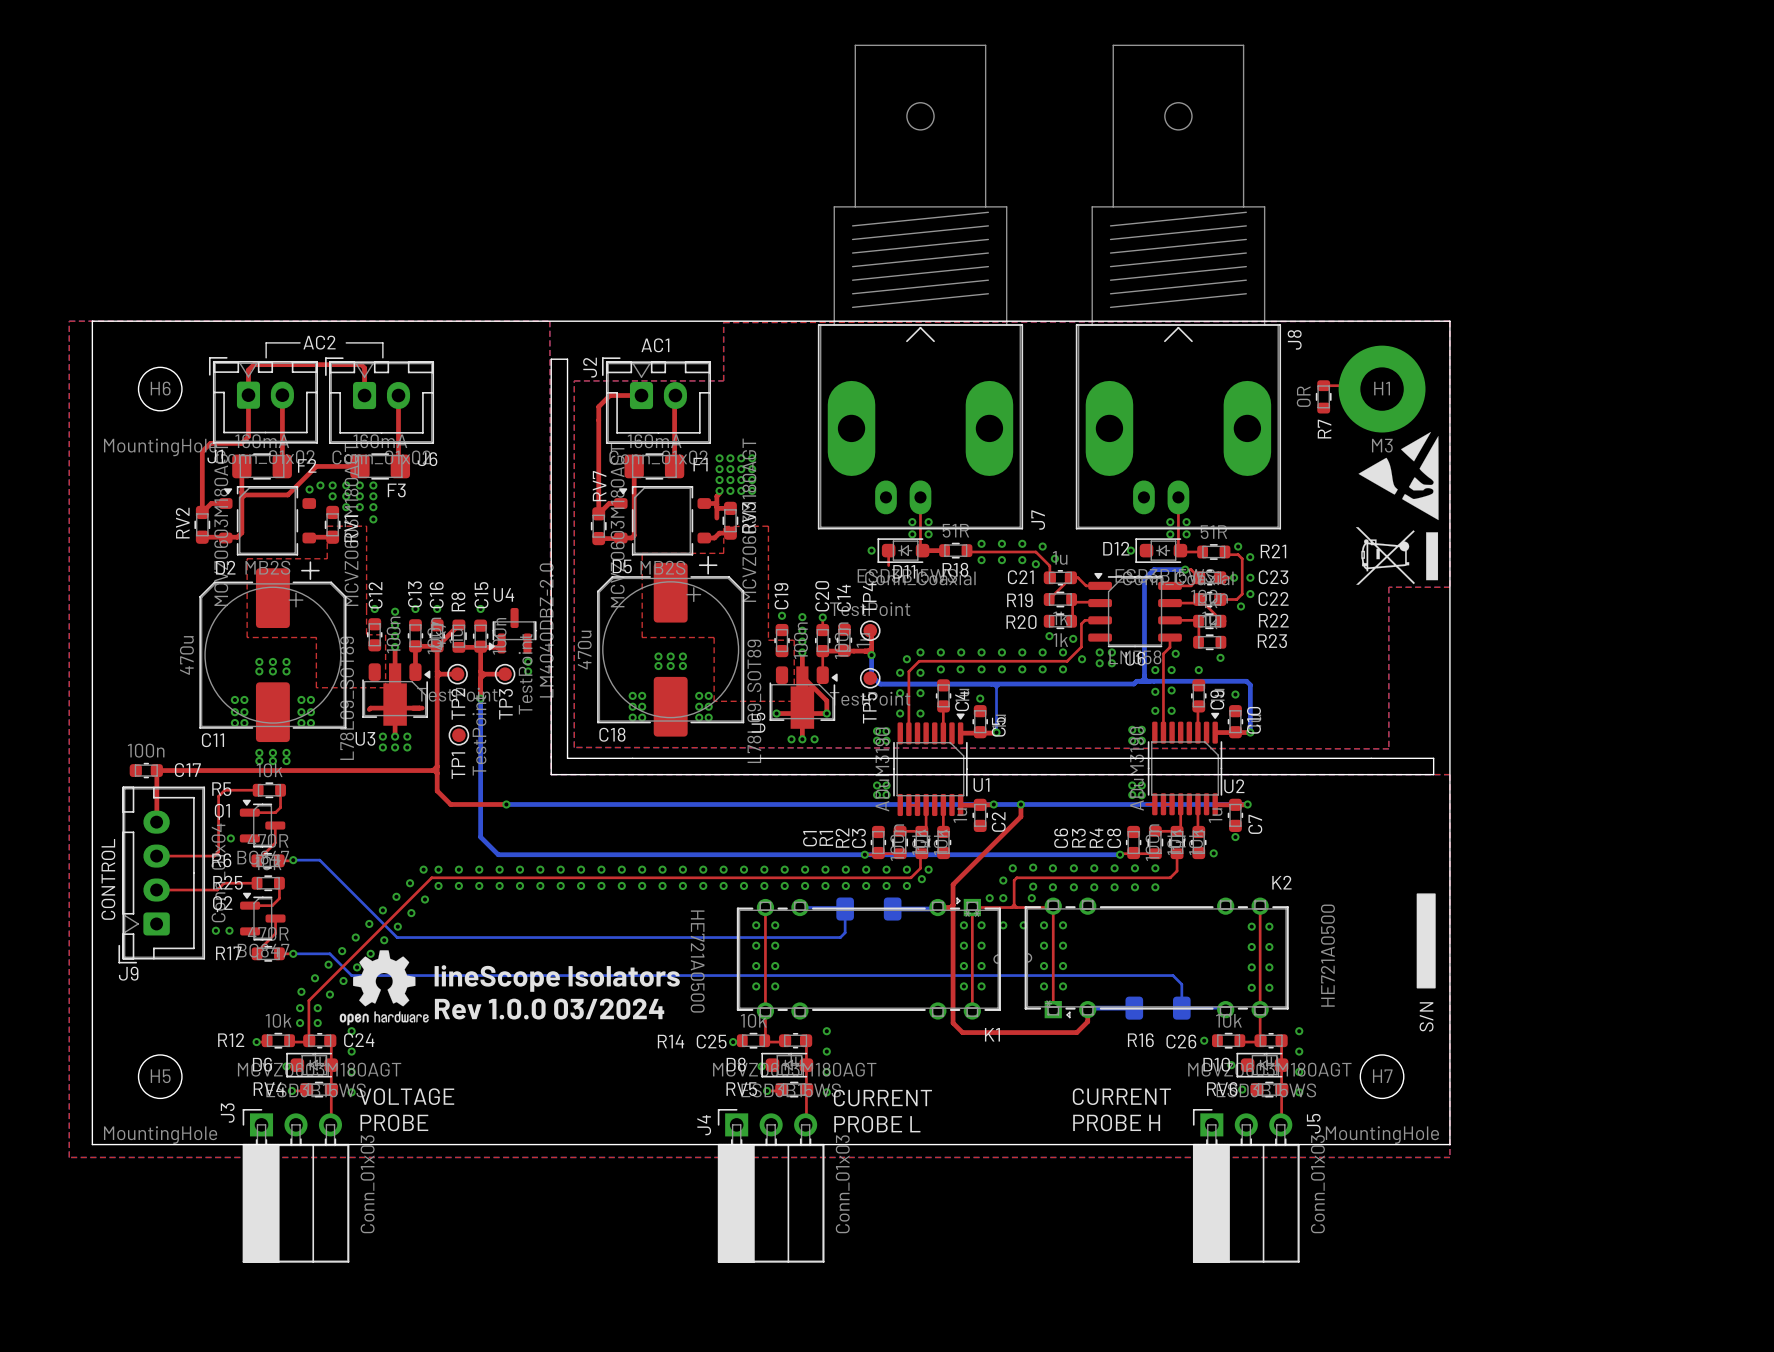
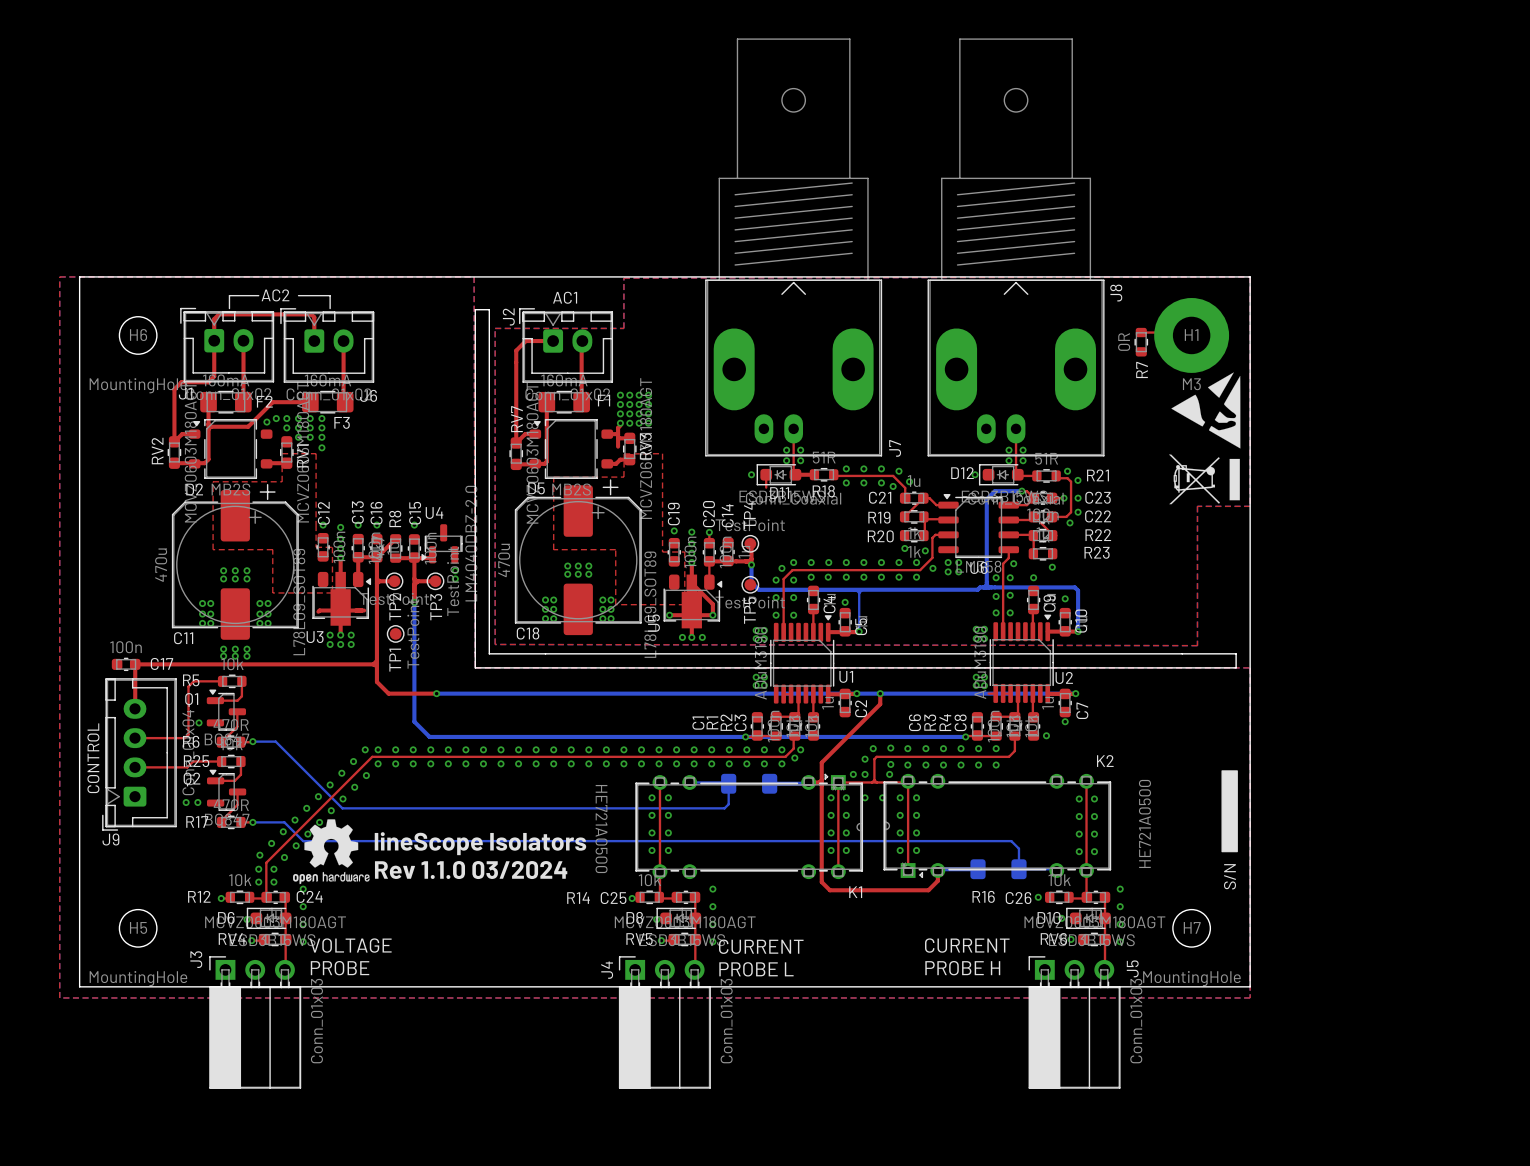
text: Rev 1.0.0 03/2024 (549, 1009) -> Rev 1.1.0 03/2024 (471, 870)

